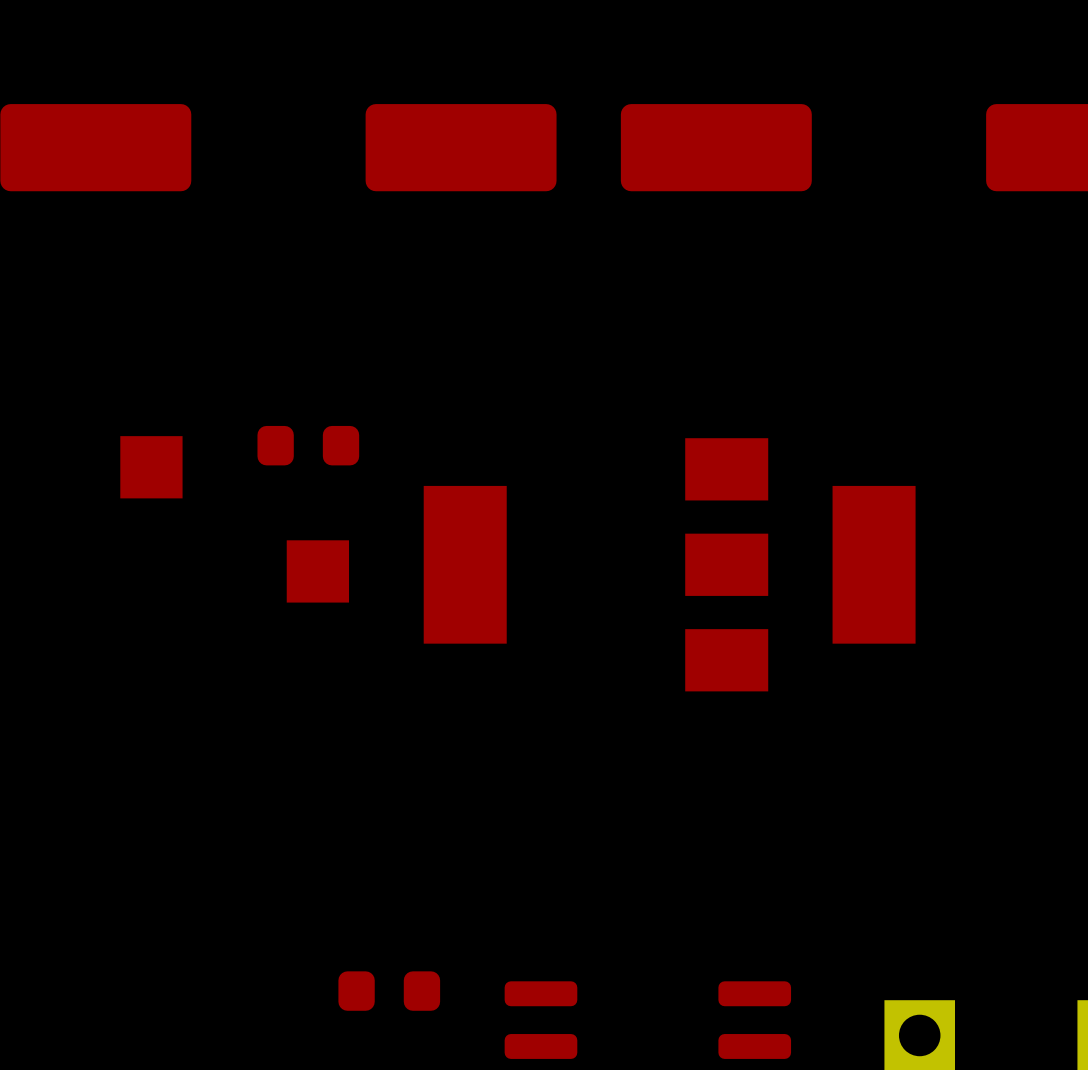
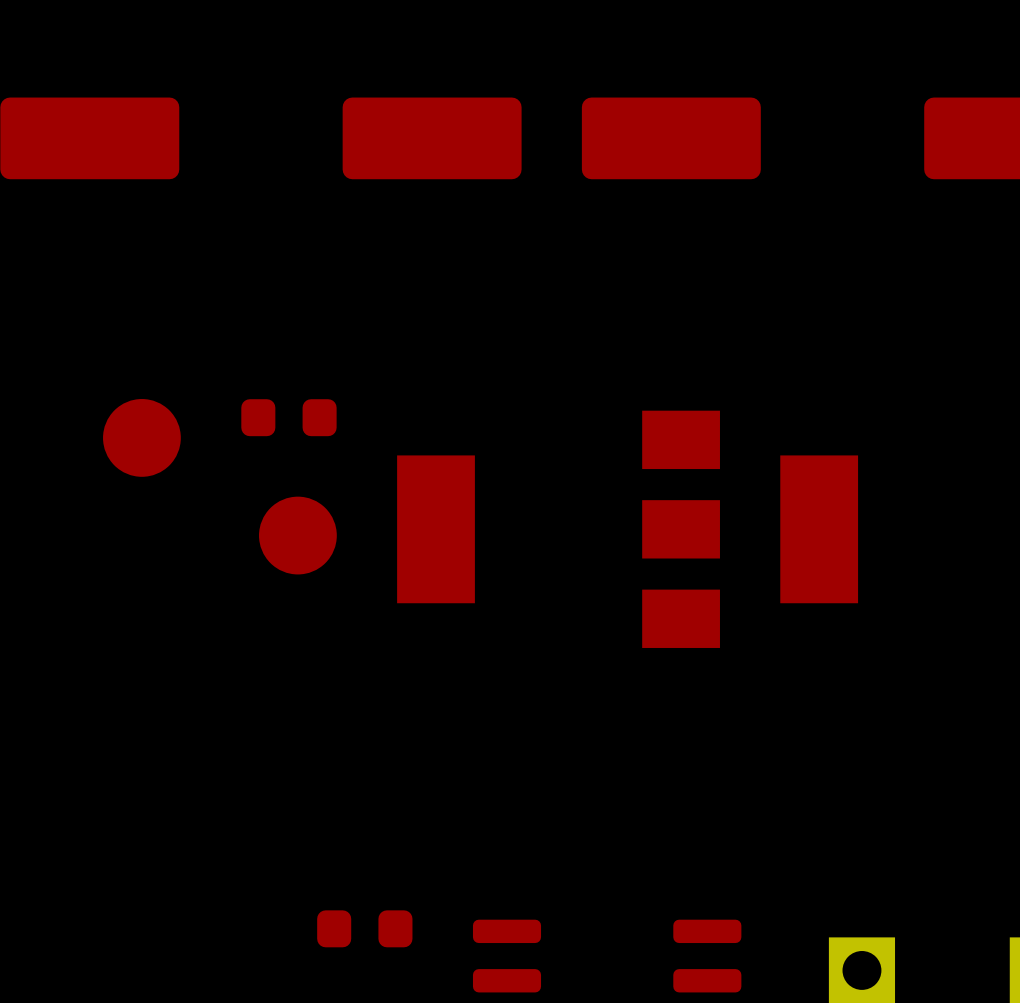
part footprint: [120, 436, 183, 499] -> [103, 399, 181, 477]
part footprint: [286, 540, 350, 603] -> [259, 496, 337, 575]

